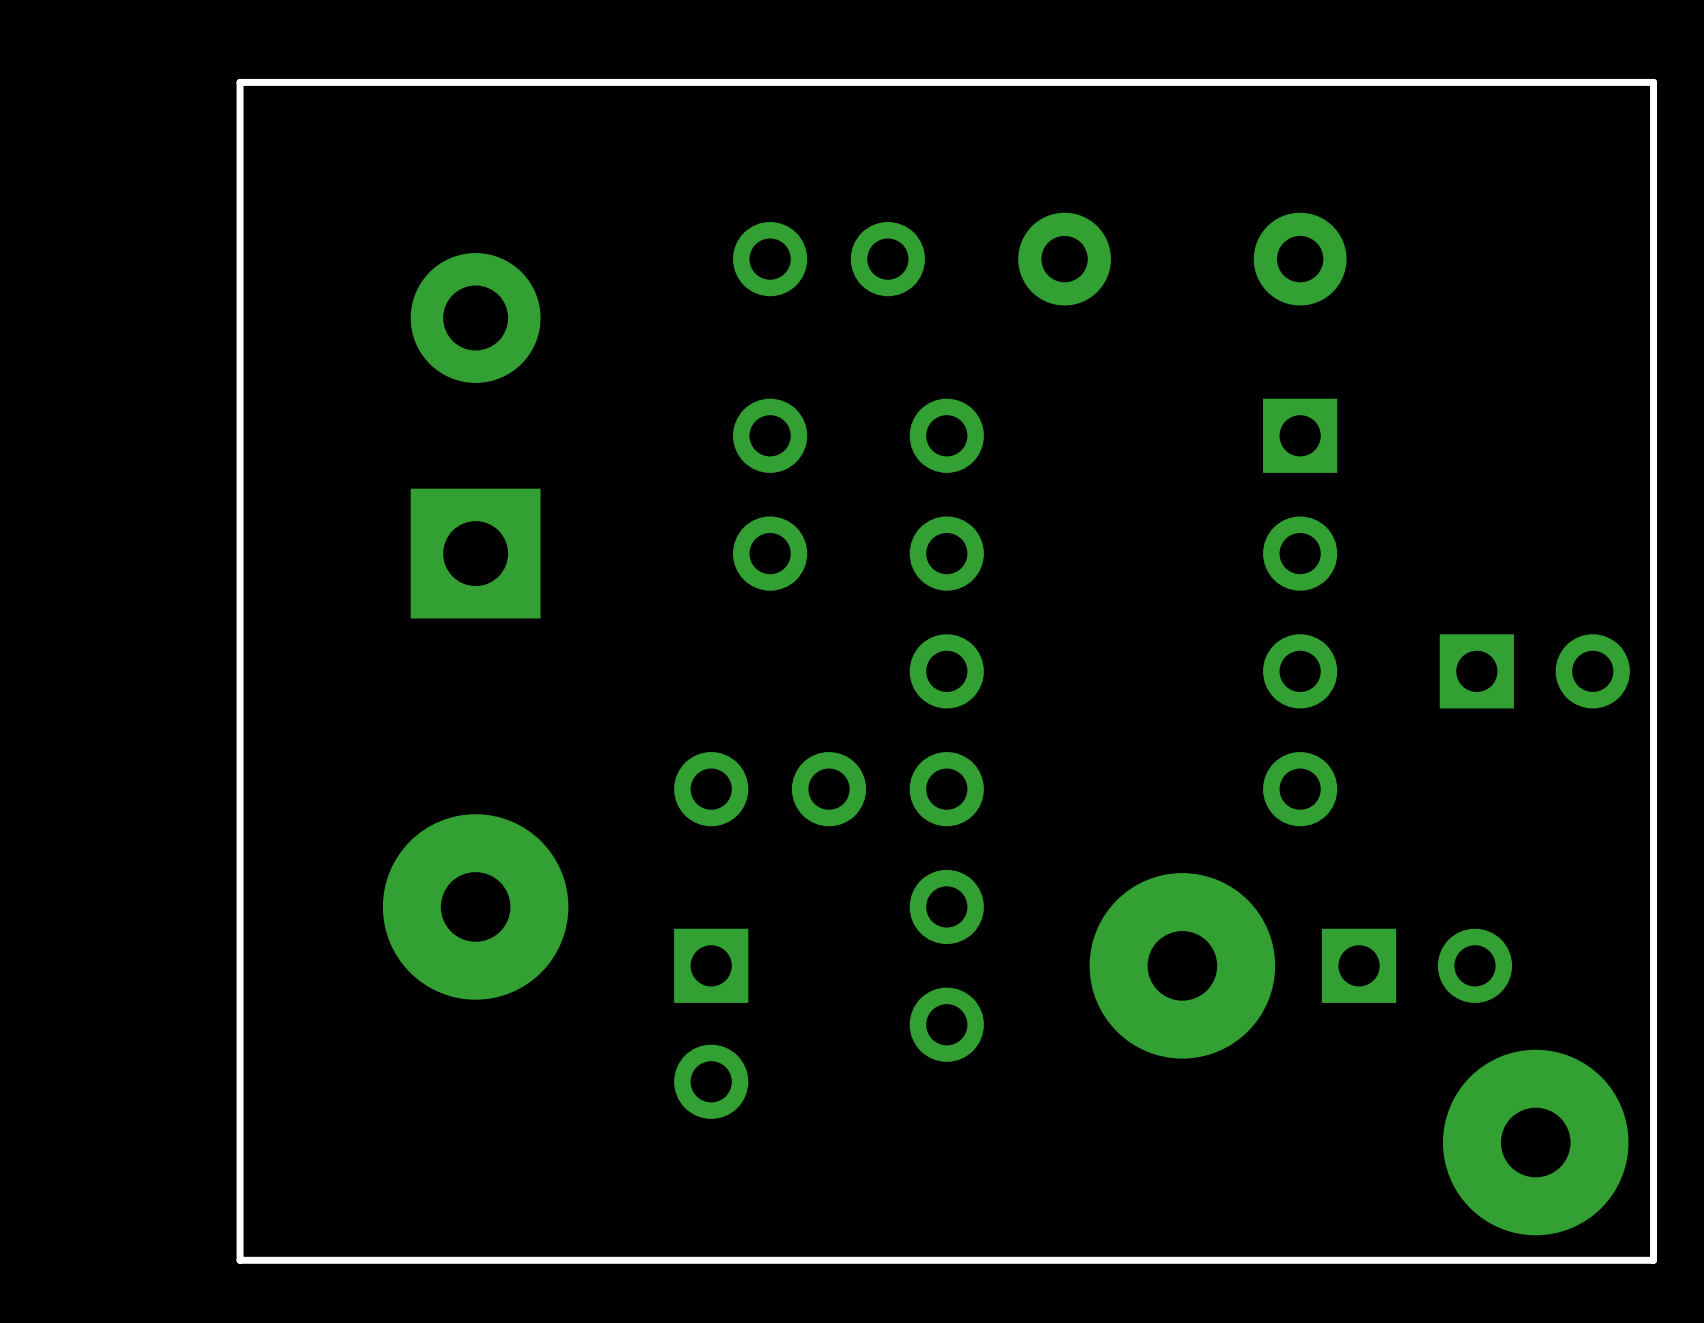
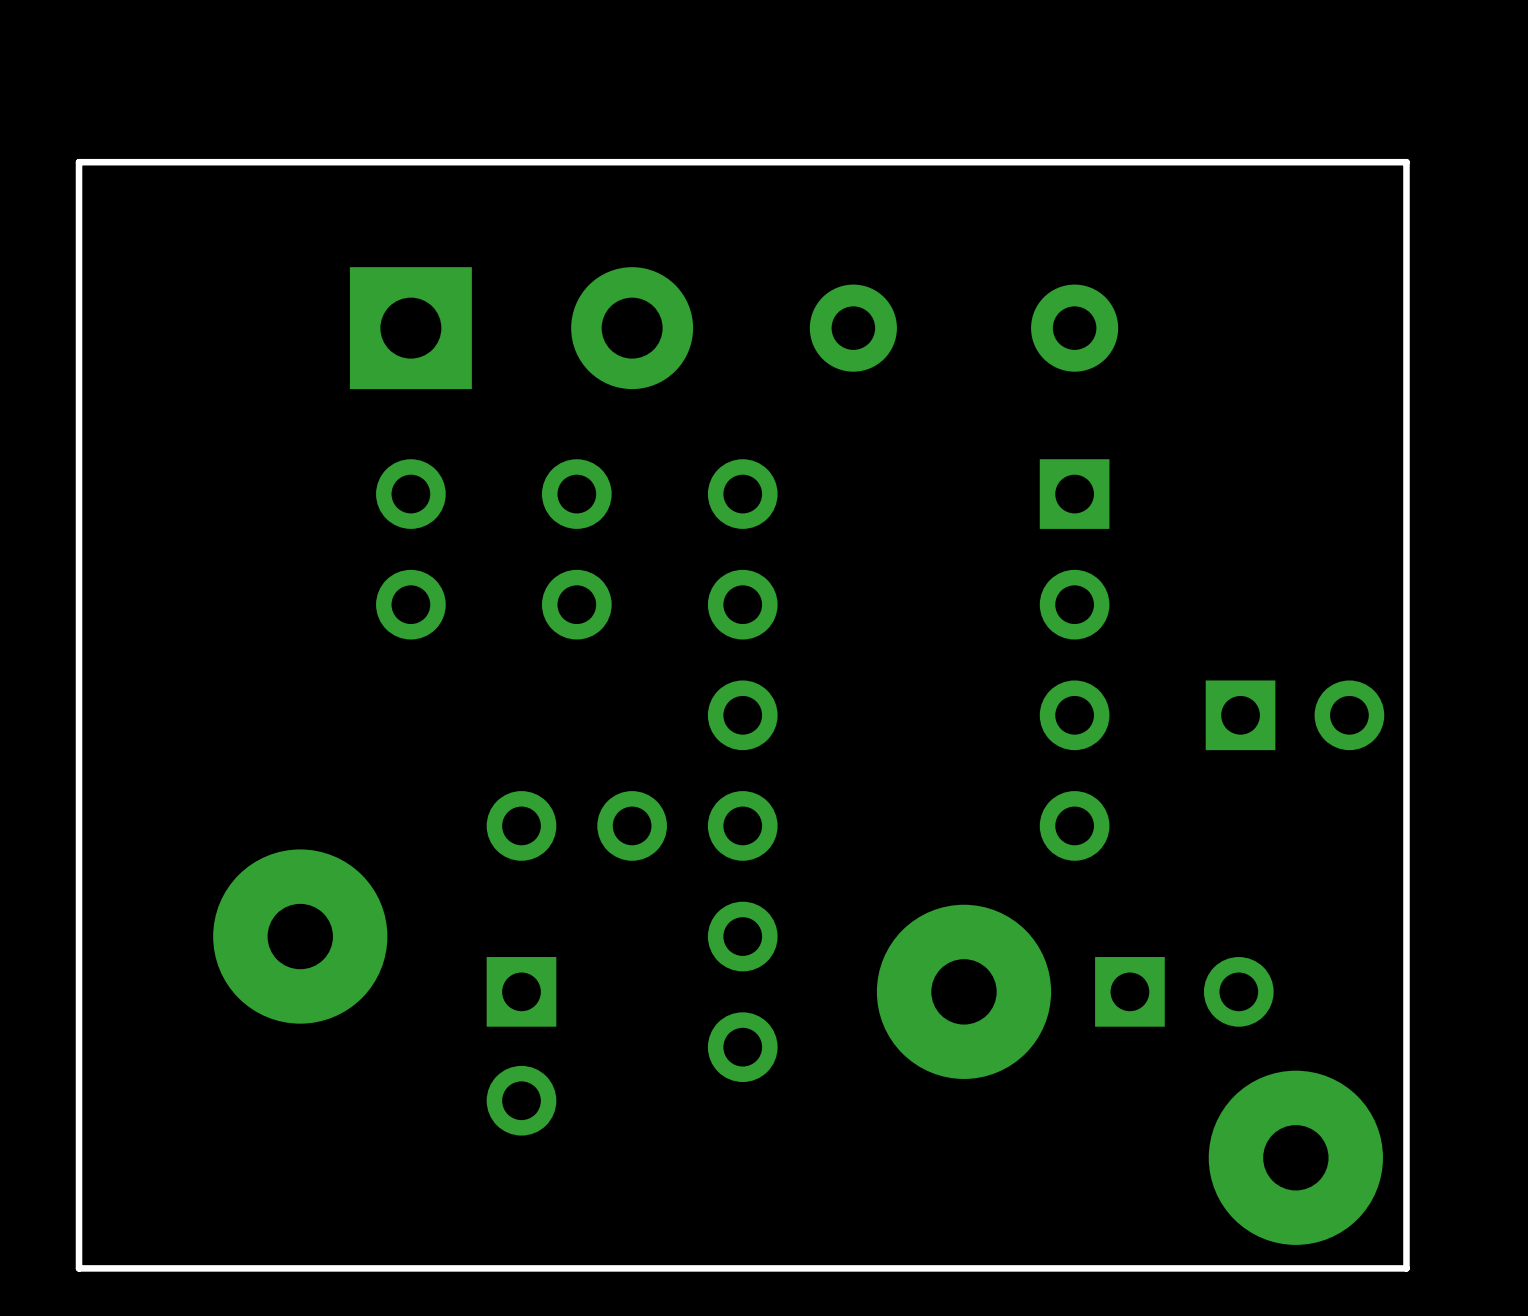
part rotation: 0° (829, 259) -> 90° clockwise (410, 549)
part position: (829, 259) -> (410, 549)
part rotation: 0° (475, 435) -> 90° clockwise (521, 328)
part position: (475, 435) -> (521, 328)

